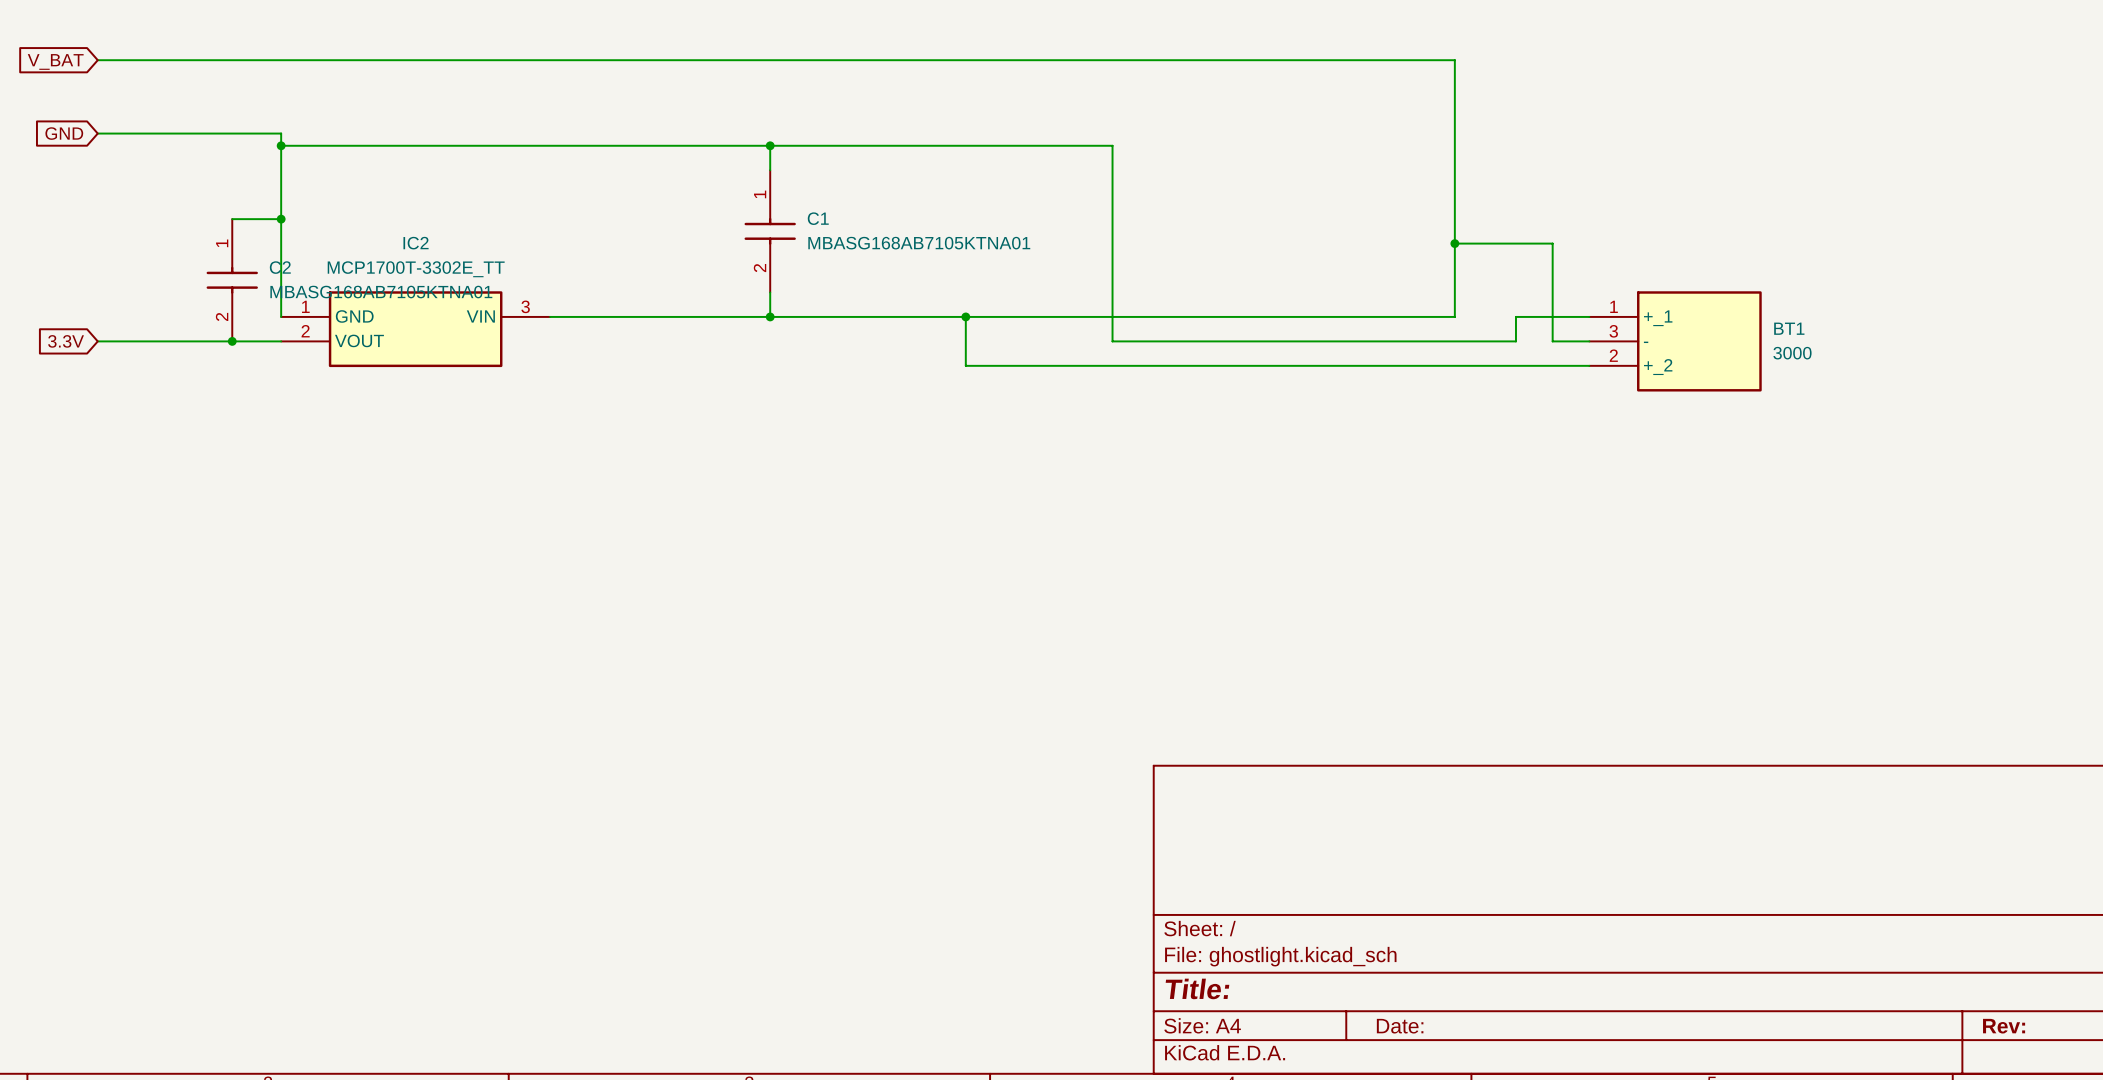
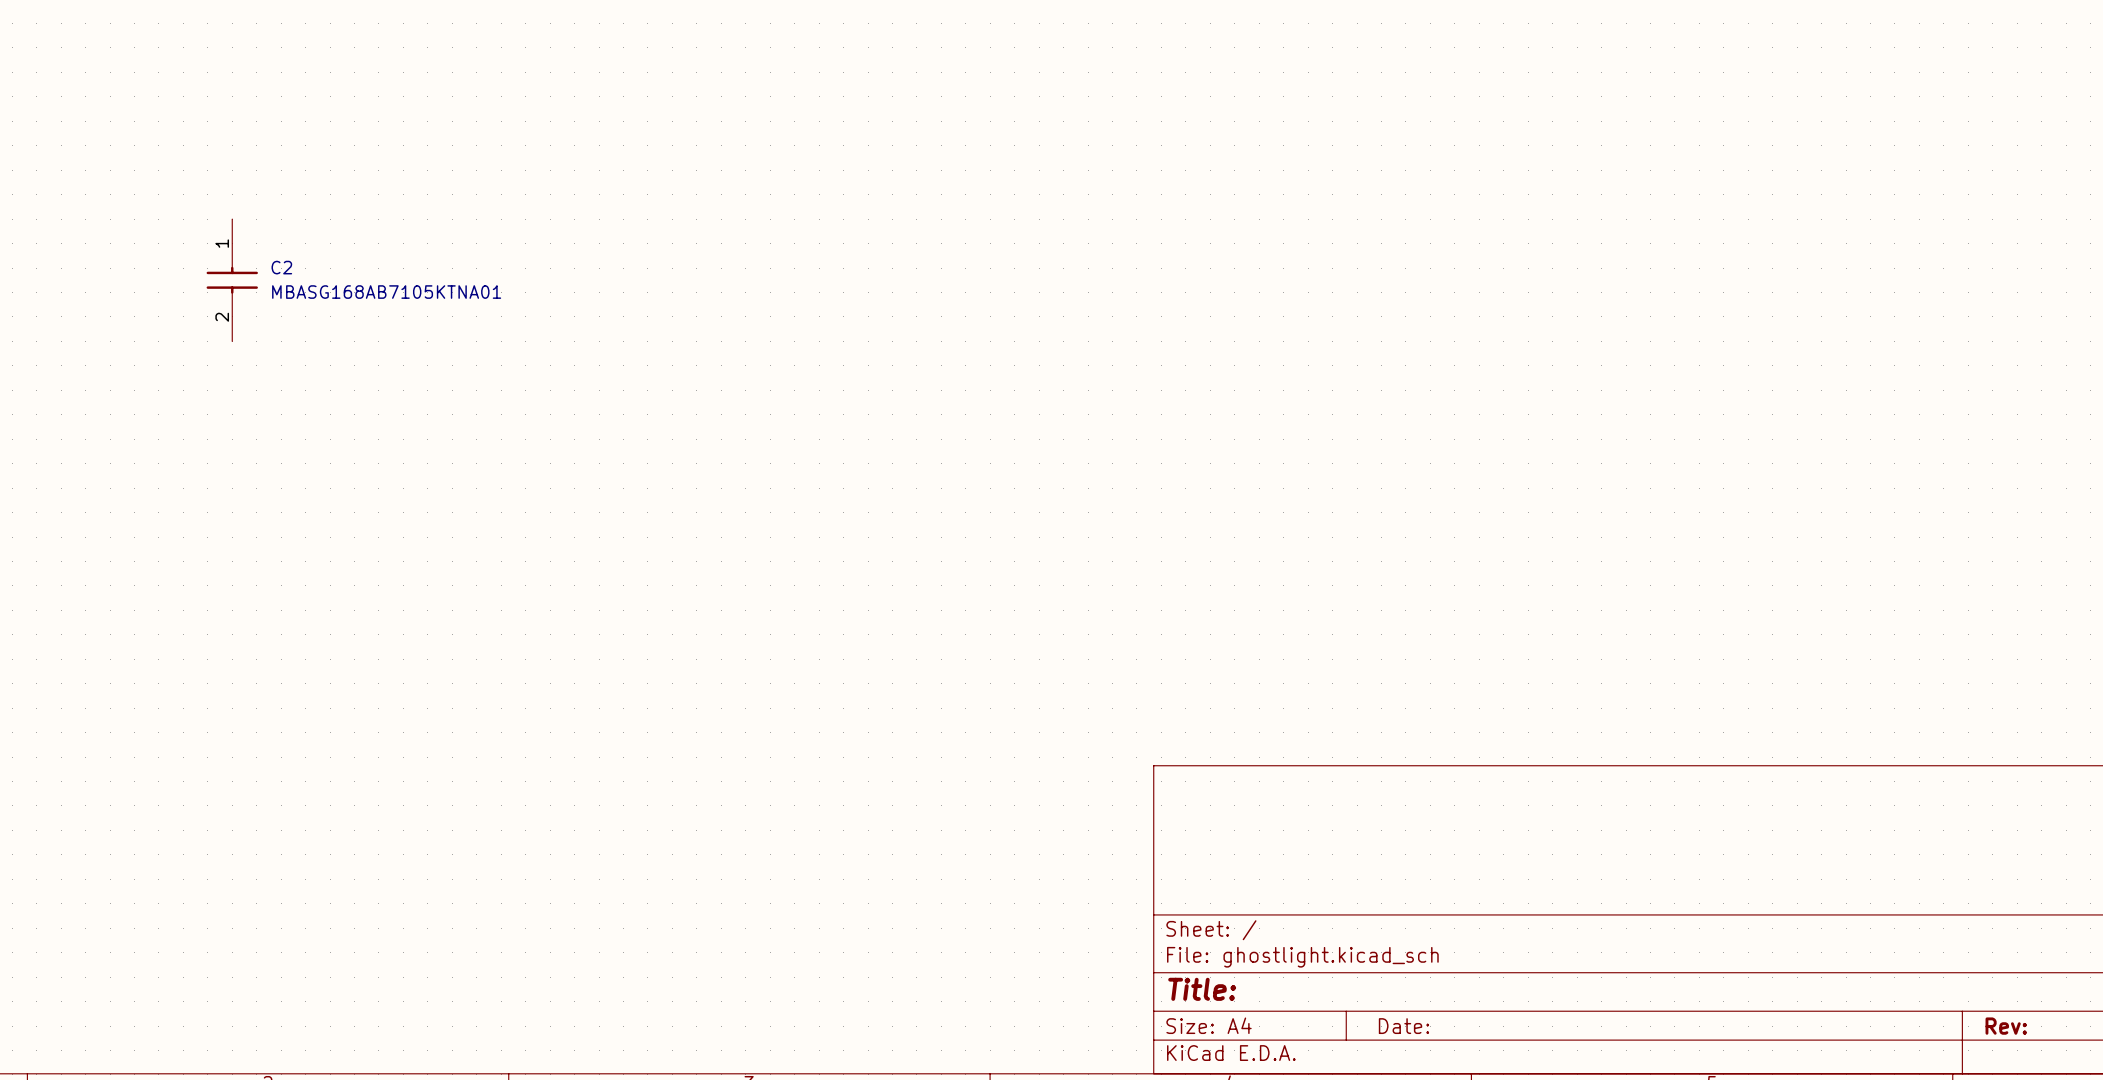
wire: (97, 60) (1454, 60) (1454, 316) (550, 316) -> none
global label: V_BAT (55, 61) -> none
global label: GND (64, 133) -> none
wire: (97, 133) (281, 133) (281, 316) -> none
wire: (281, 145) (1112, 145) (1112, 341) (1515, 341) (1515, 316) (1589, 316) -> none
junction: (281, 145) -> none
wire: (770, 145) (770, 170) -> none
junction: (770, 145) -> none
wire: (232, 219) (281, 219) -> none
junction: (281, 219) -> none
C1: MBASG168AB7105KTNA01 (770, 231) -> none
wire: (1454, 243) (1552, 243) (1552, 341) (1589, 341) -> none
junction: (1454, 243) -> none
wire: (770, 292) (770, 316) -> none
junction: (770, 316) -> none
wire: (965, 316) (965, 365) (1589, 365) -> none
junction: (965, 316) -> none
IC2: MCP1700T-3302E_TT (415, 329) -> none
global label: 3.3V (66, 341) -> none
wire: (97, 341) (281, 341) -> none
junction: (232, 341) -> none
BT1: 3000 (1675, 341) -> none

